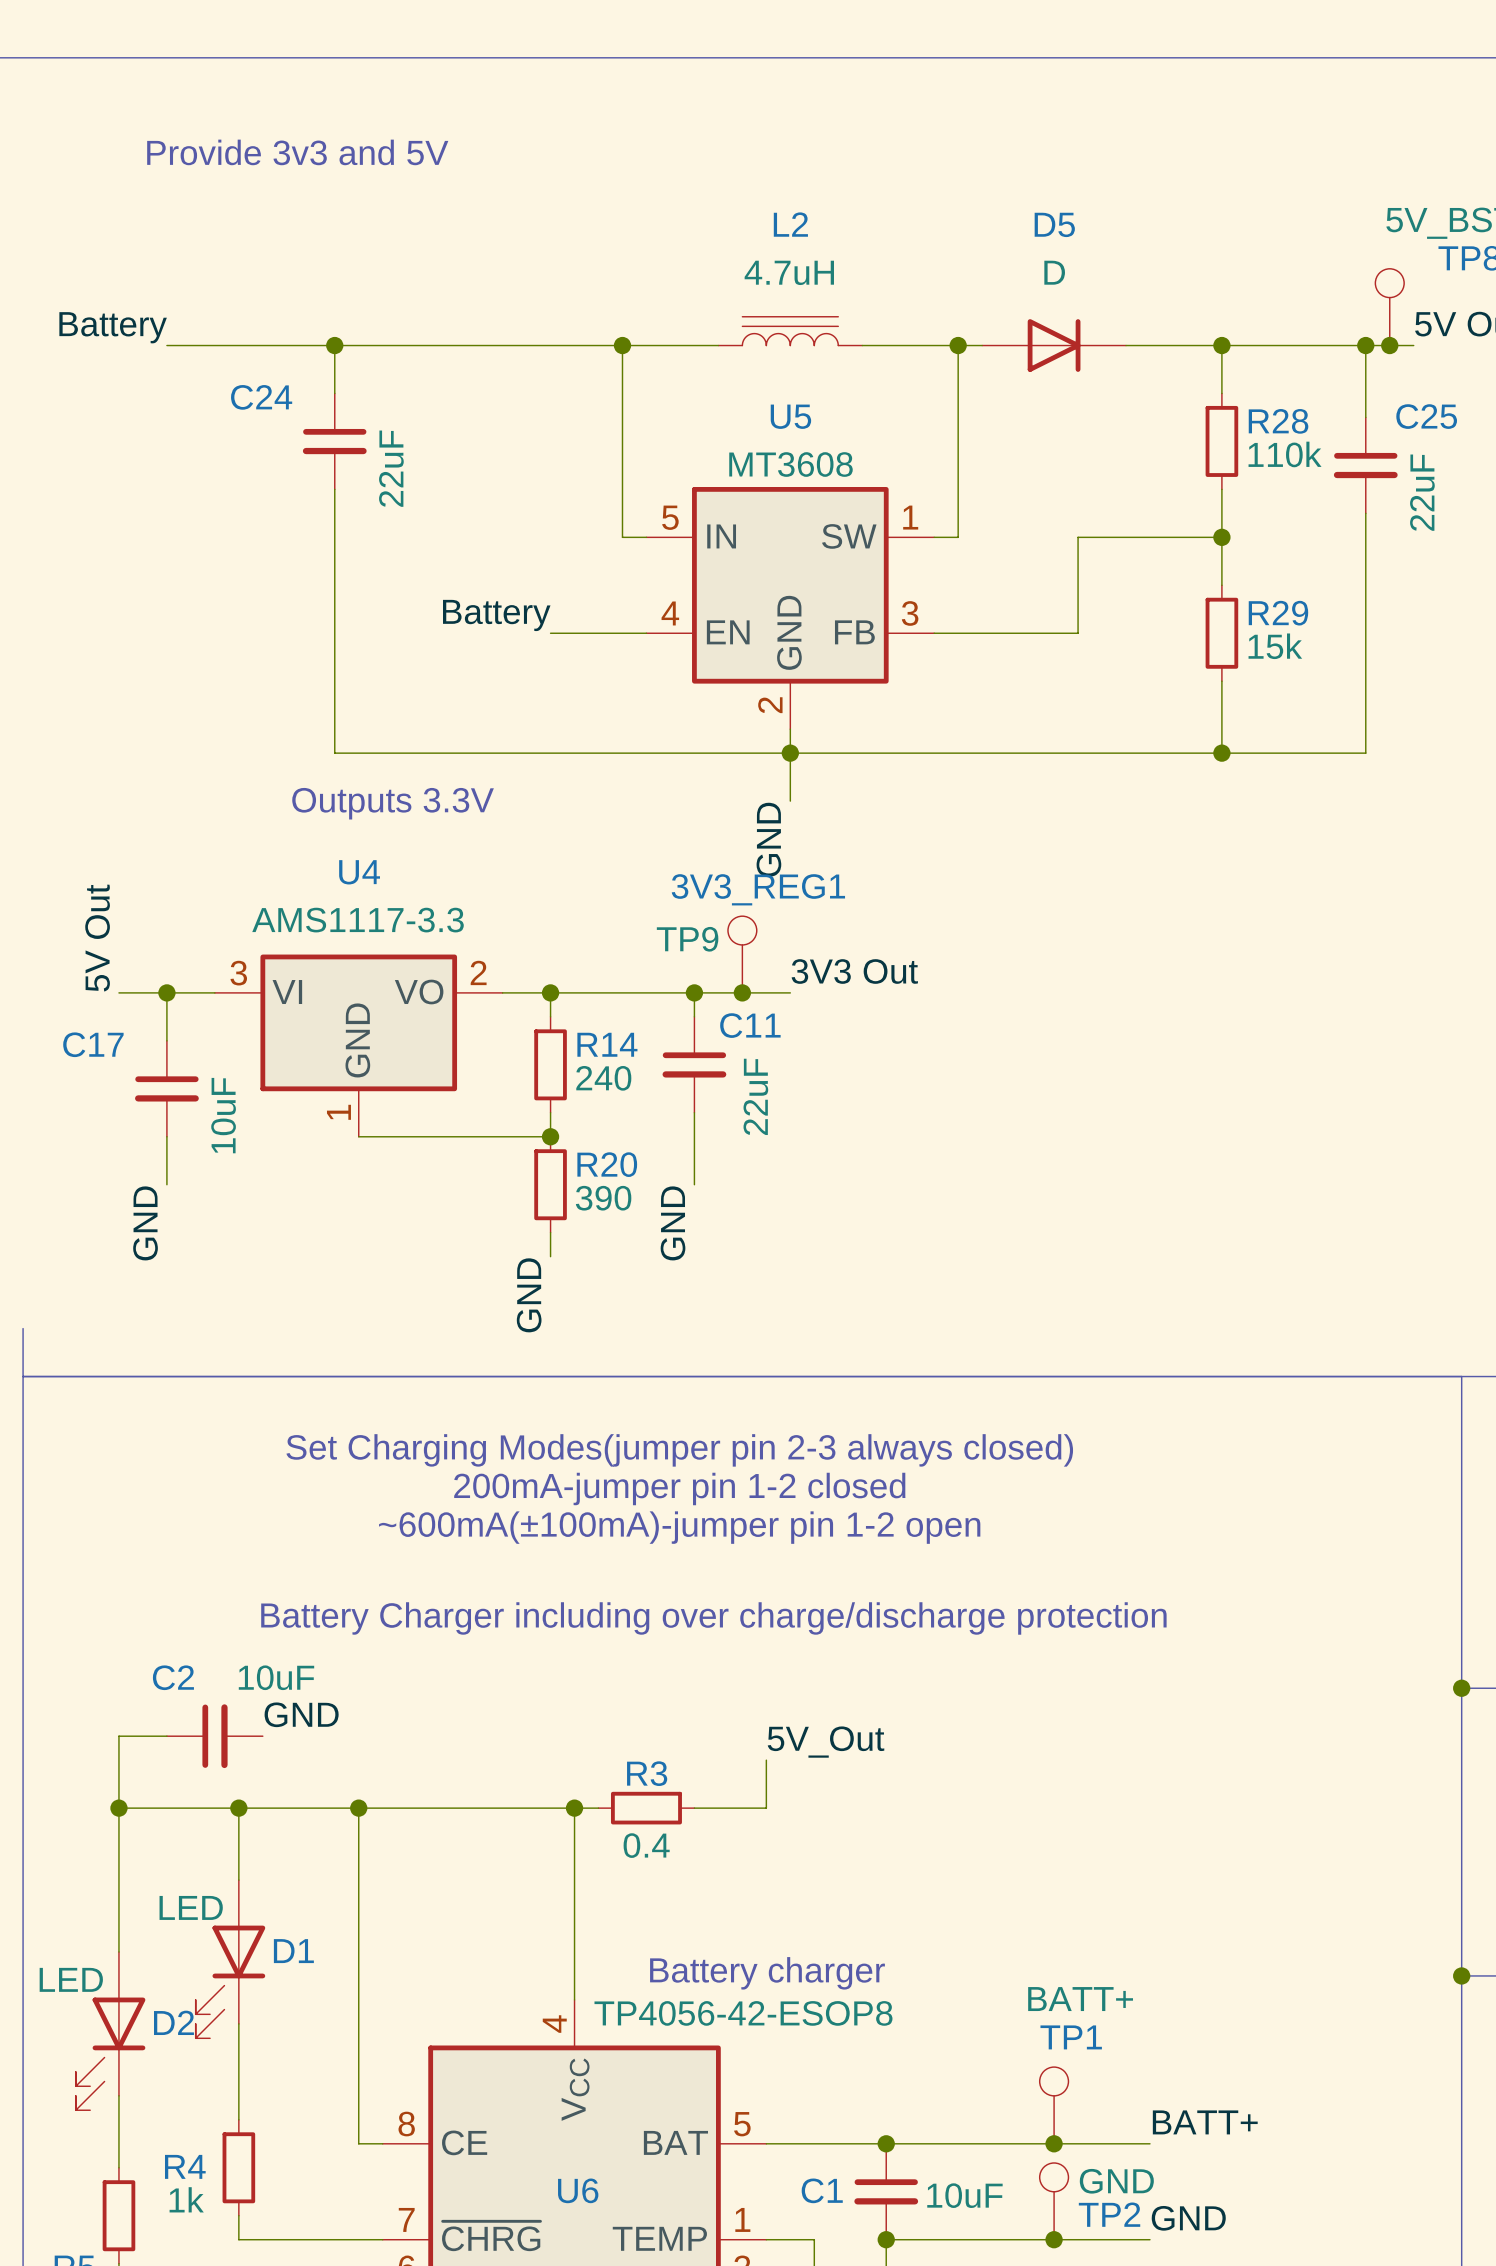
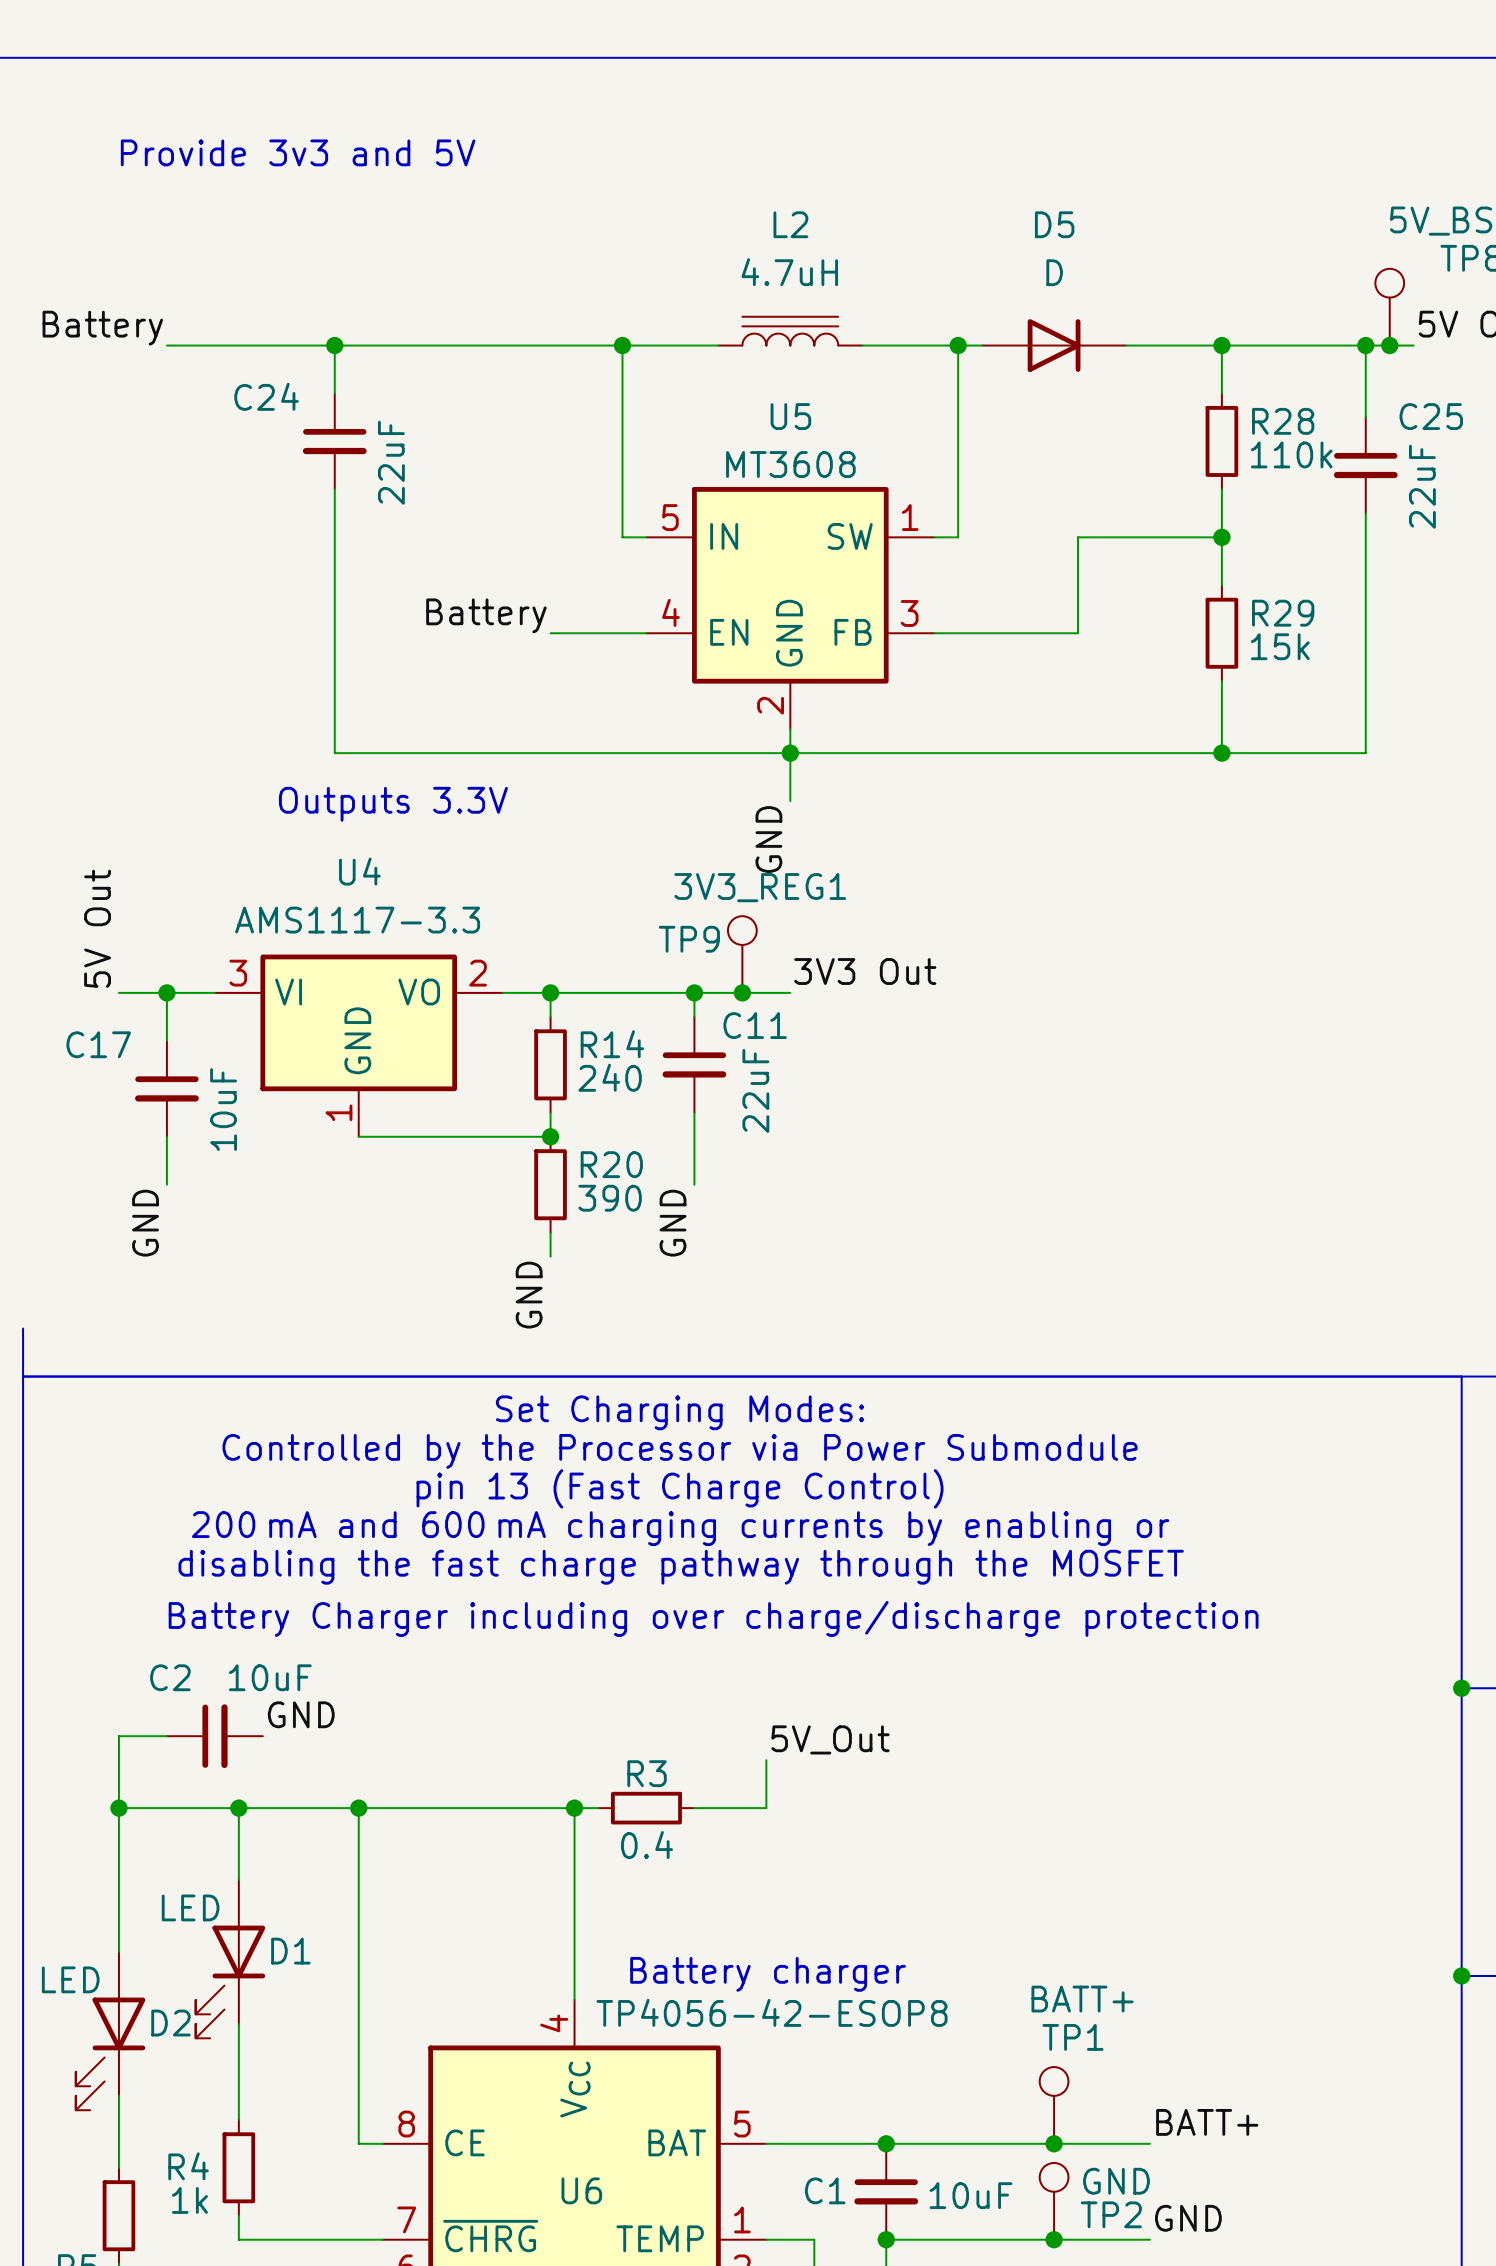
text: none -> Set Charging Modes: (680, 1412)
text: Set Charging Modes(jumper pin 2-3 always closed) (679, 1450) -> Controlled by the Processor via Power Submodule (680, 1451)
text: 200mA-jumper pin 1-2 closed (679, 1488) -> pin 13 (Fast Charge Control) (680, 1488)
text: ~600mA(±100mA)-jumper pin 1-2 open (679, 1527) -> 200 mA and 600 mA charging currents by enabling or (680, 1528)
text: none -> disabling the fast charge pathway through the MOSFET (681, 1567)

